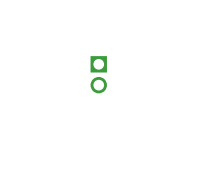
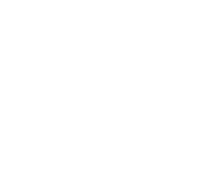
part: (98, 74) -> none

